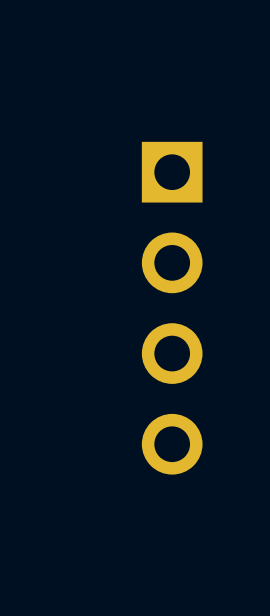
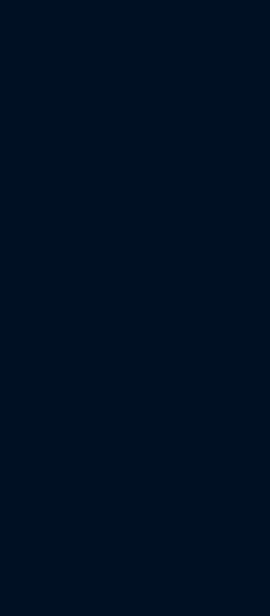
part: (172, 308) -> none

